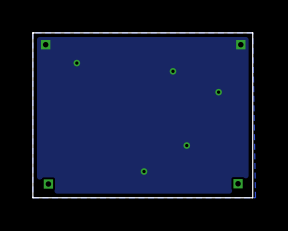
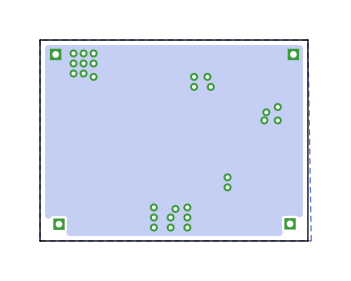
via: none -> (73, 53)
via: none -> (83, 53)
via: none -> (93, 53)
via: none -> (73, 63)
via: none -> (83, 63)
via: none -> (93, 63)
via: none -> (73, 73)
via: none -> (83, 73)
via: none -> (194, 76)
via: none -> (207, 76)
via: none -> (194, 86)
via: none -> (277, 107)
via: none -> (264, 120)
via: none -> (277, 120)
via: none -> (227, 187)
via: none -> (153, 207)
via: none -> (187, 207)
via: none -> (153, 217)
via: none -> (170, 217)
via: none -> (187, 217)
via: none -> (153, 227)
via: none -> (170, 227)
via: none -> (187, 227)

